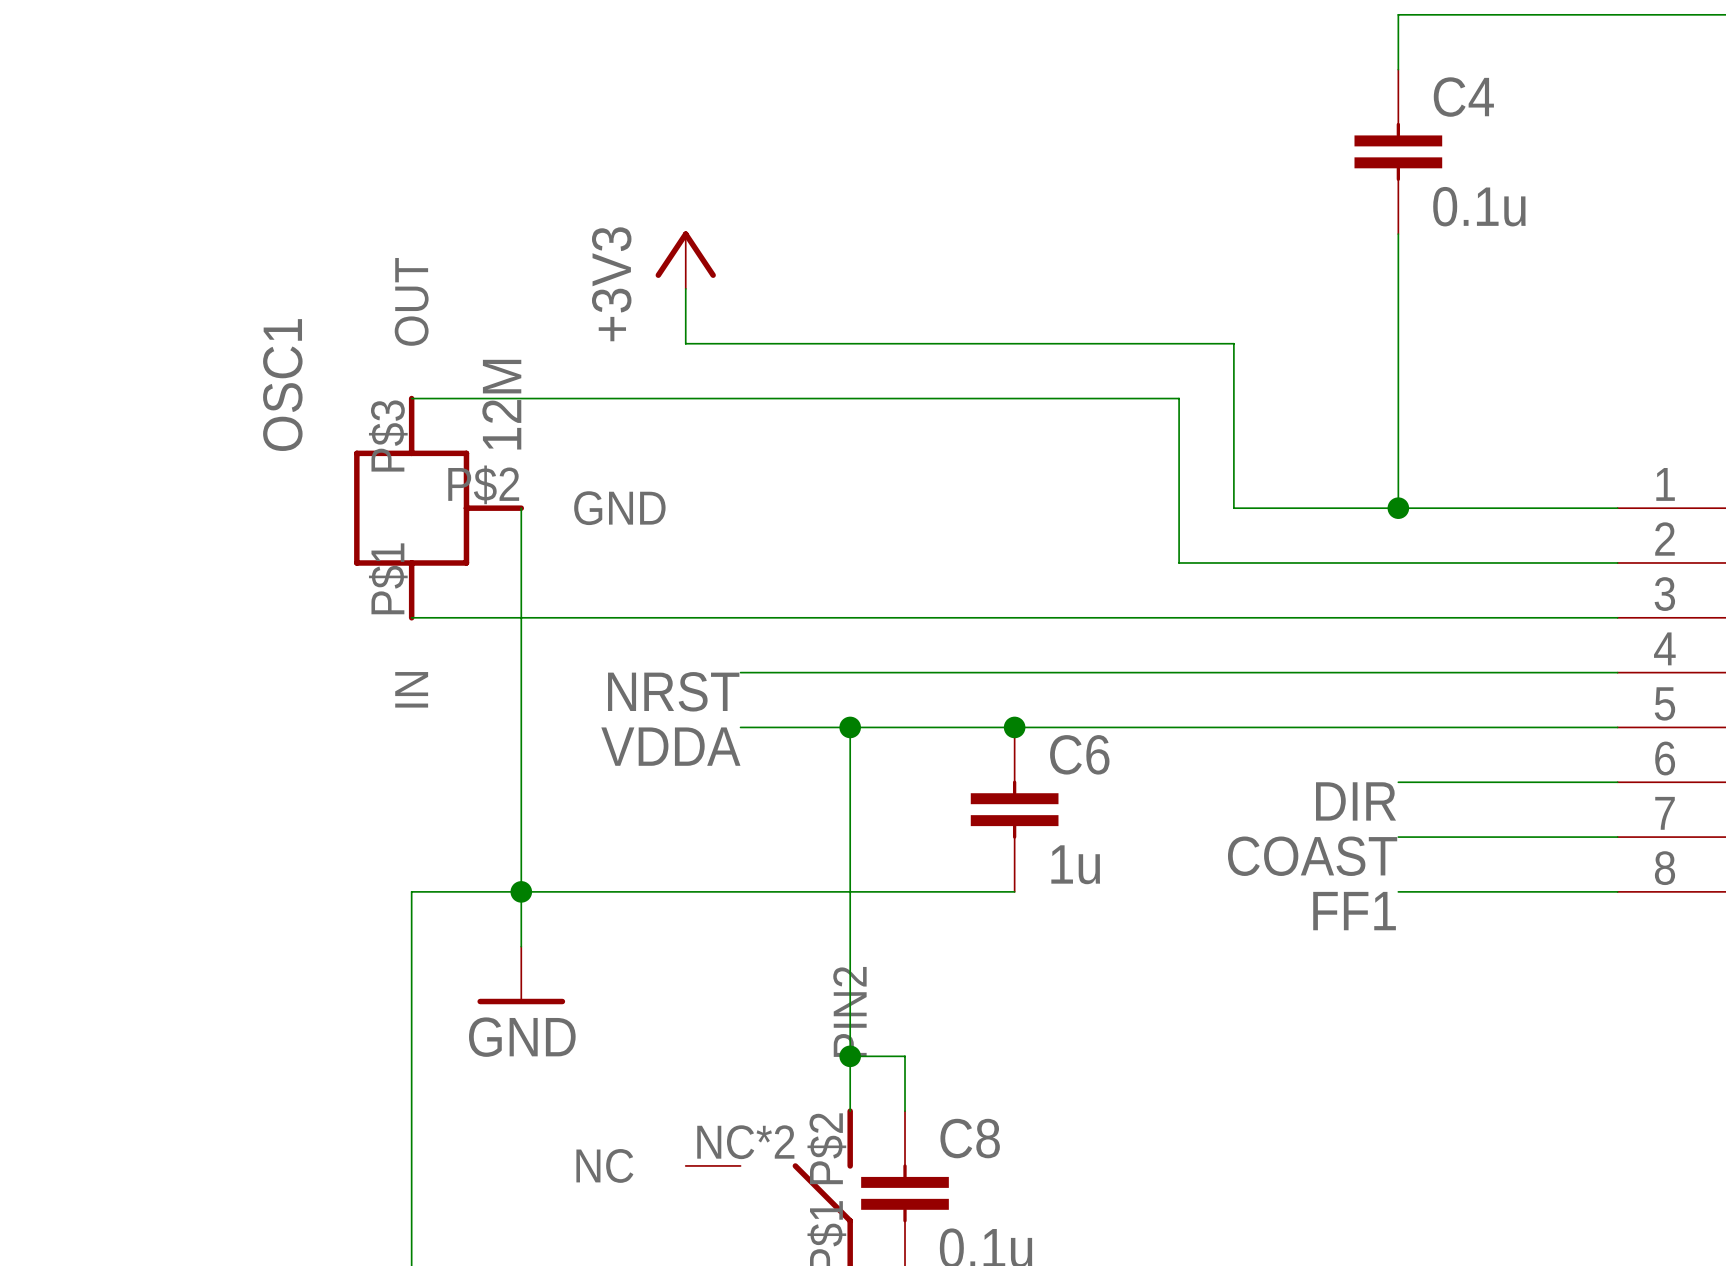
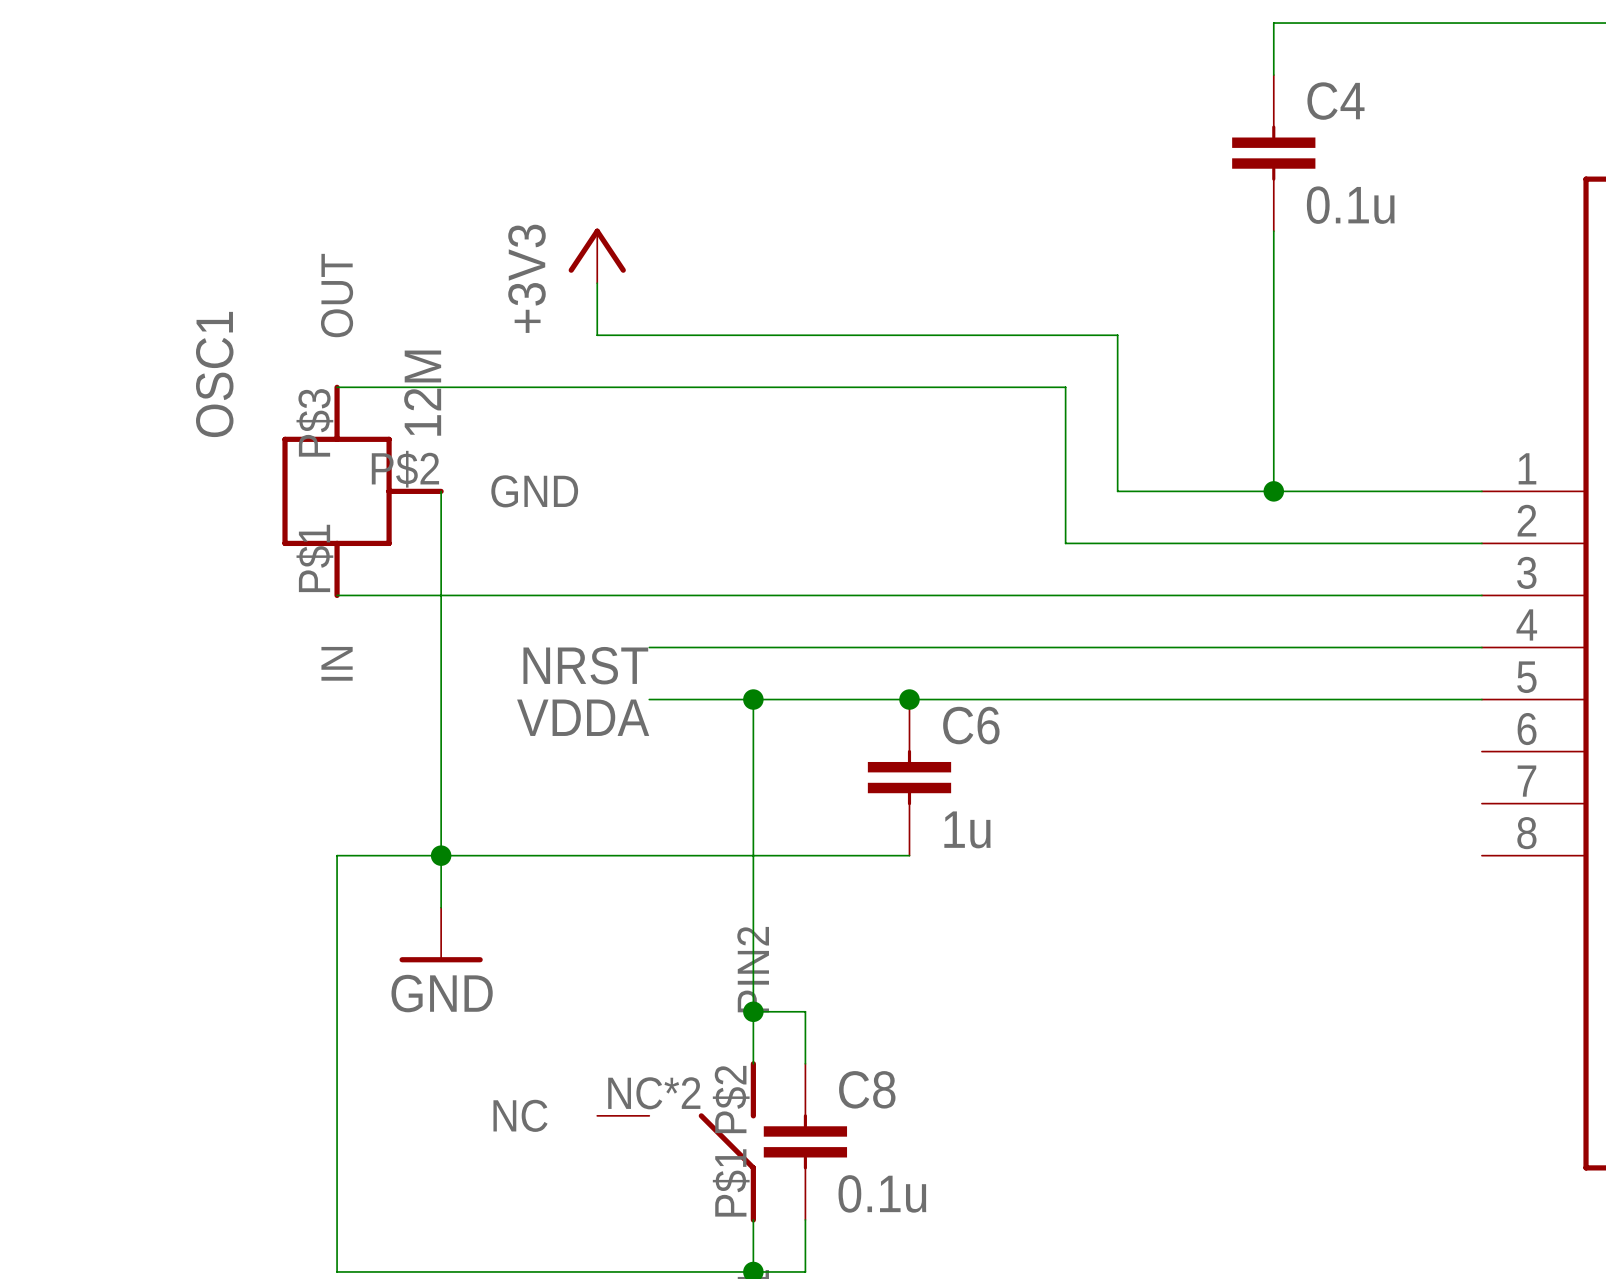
wire: (1398, 782) (1617, 782) -> none
label: DIR (1356, 801) -> none
wire: (1398, 837) (1617, 837) -> none
label: COAST (1312, 856) -> none
wire: (1398, 891) (1617, 891) -> none
label: FF1 (1354, 911) -> none

